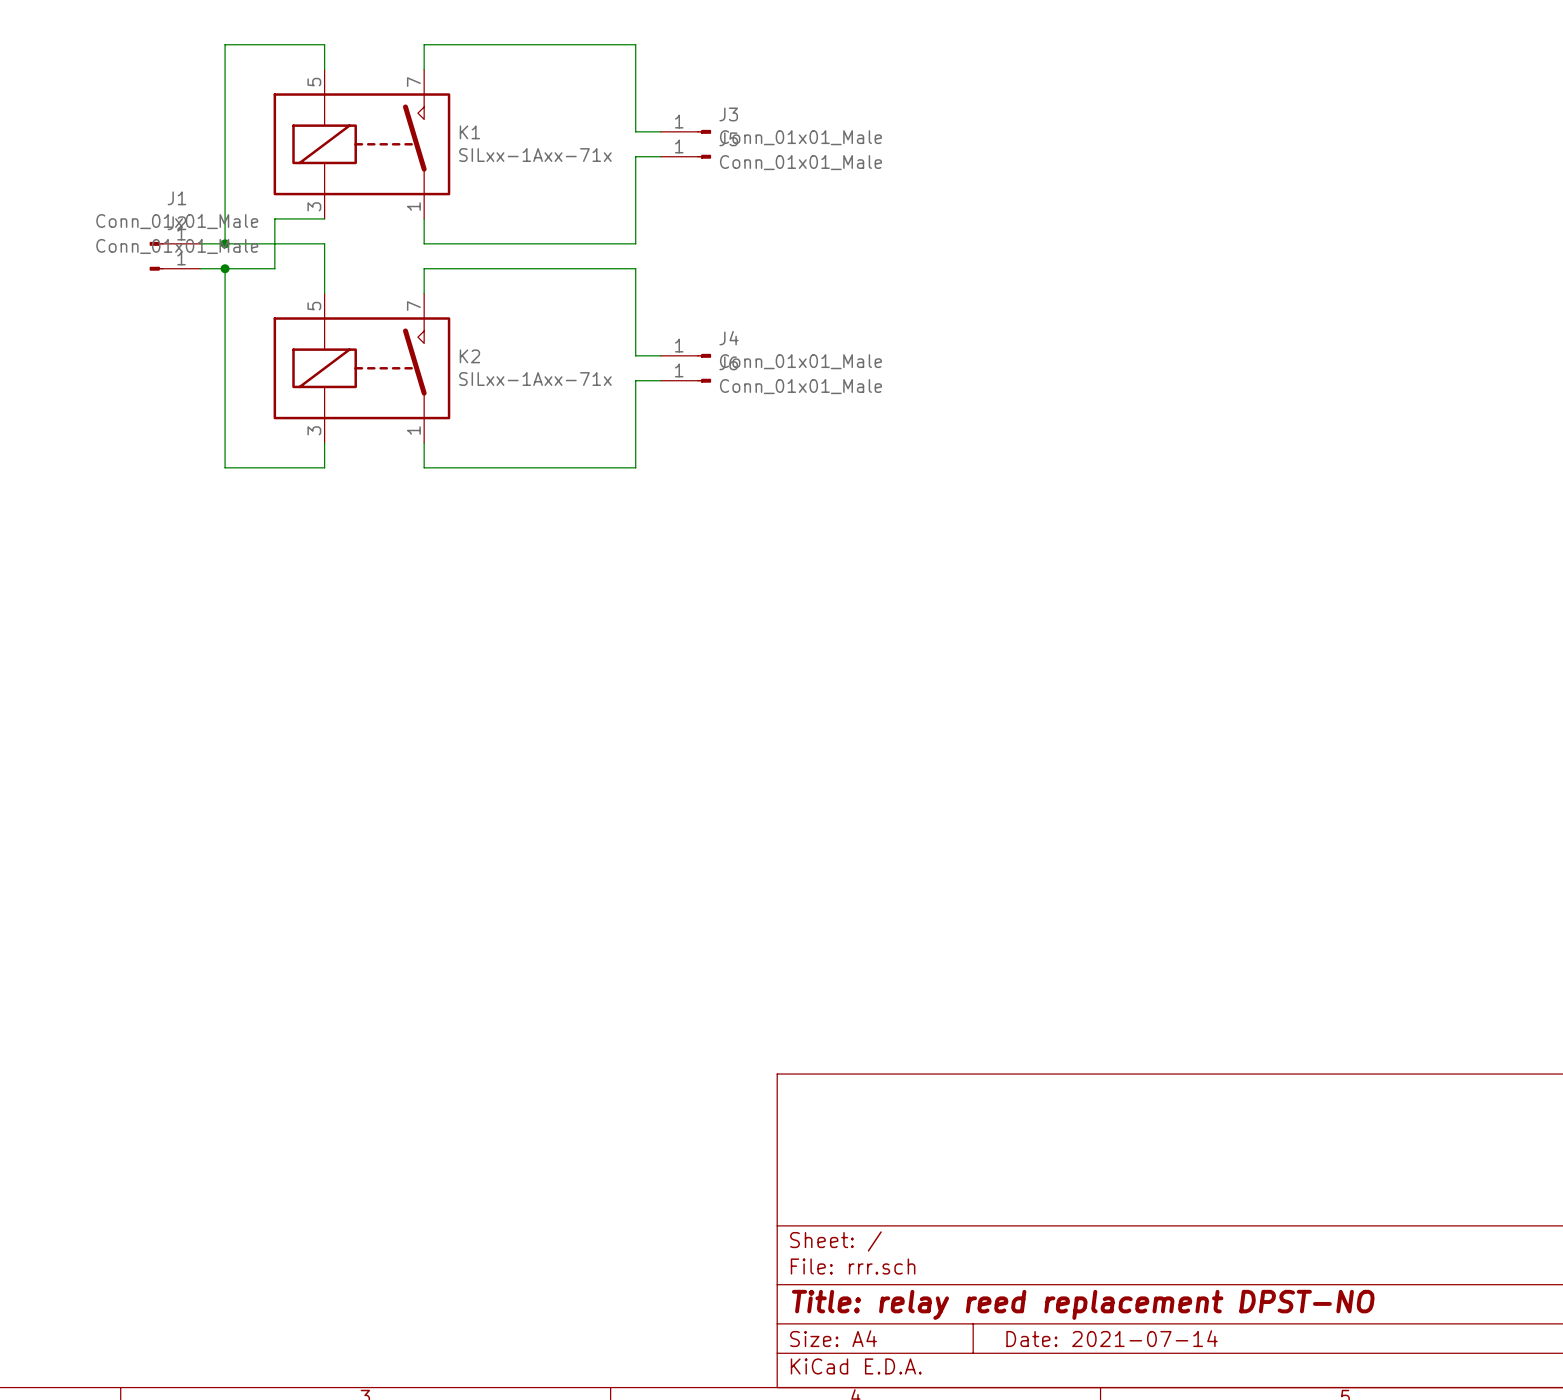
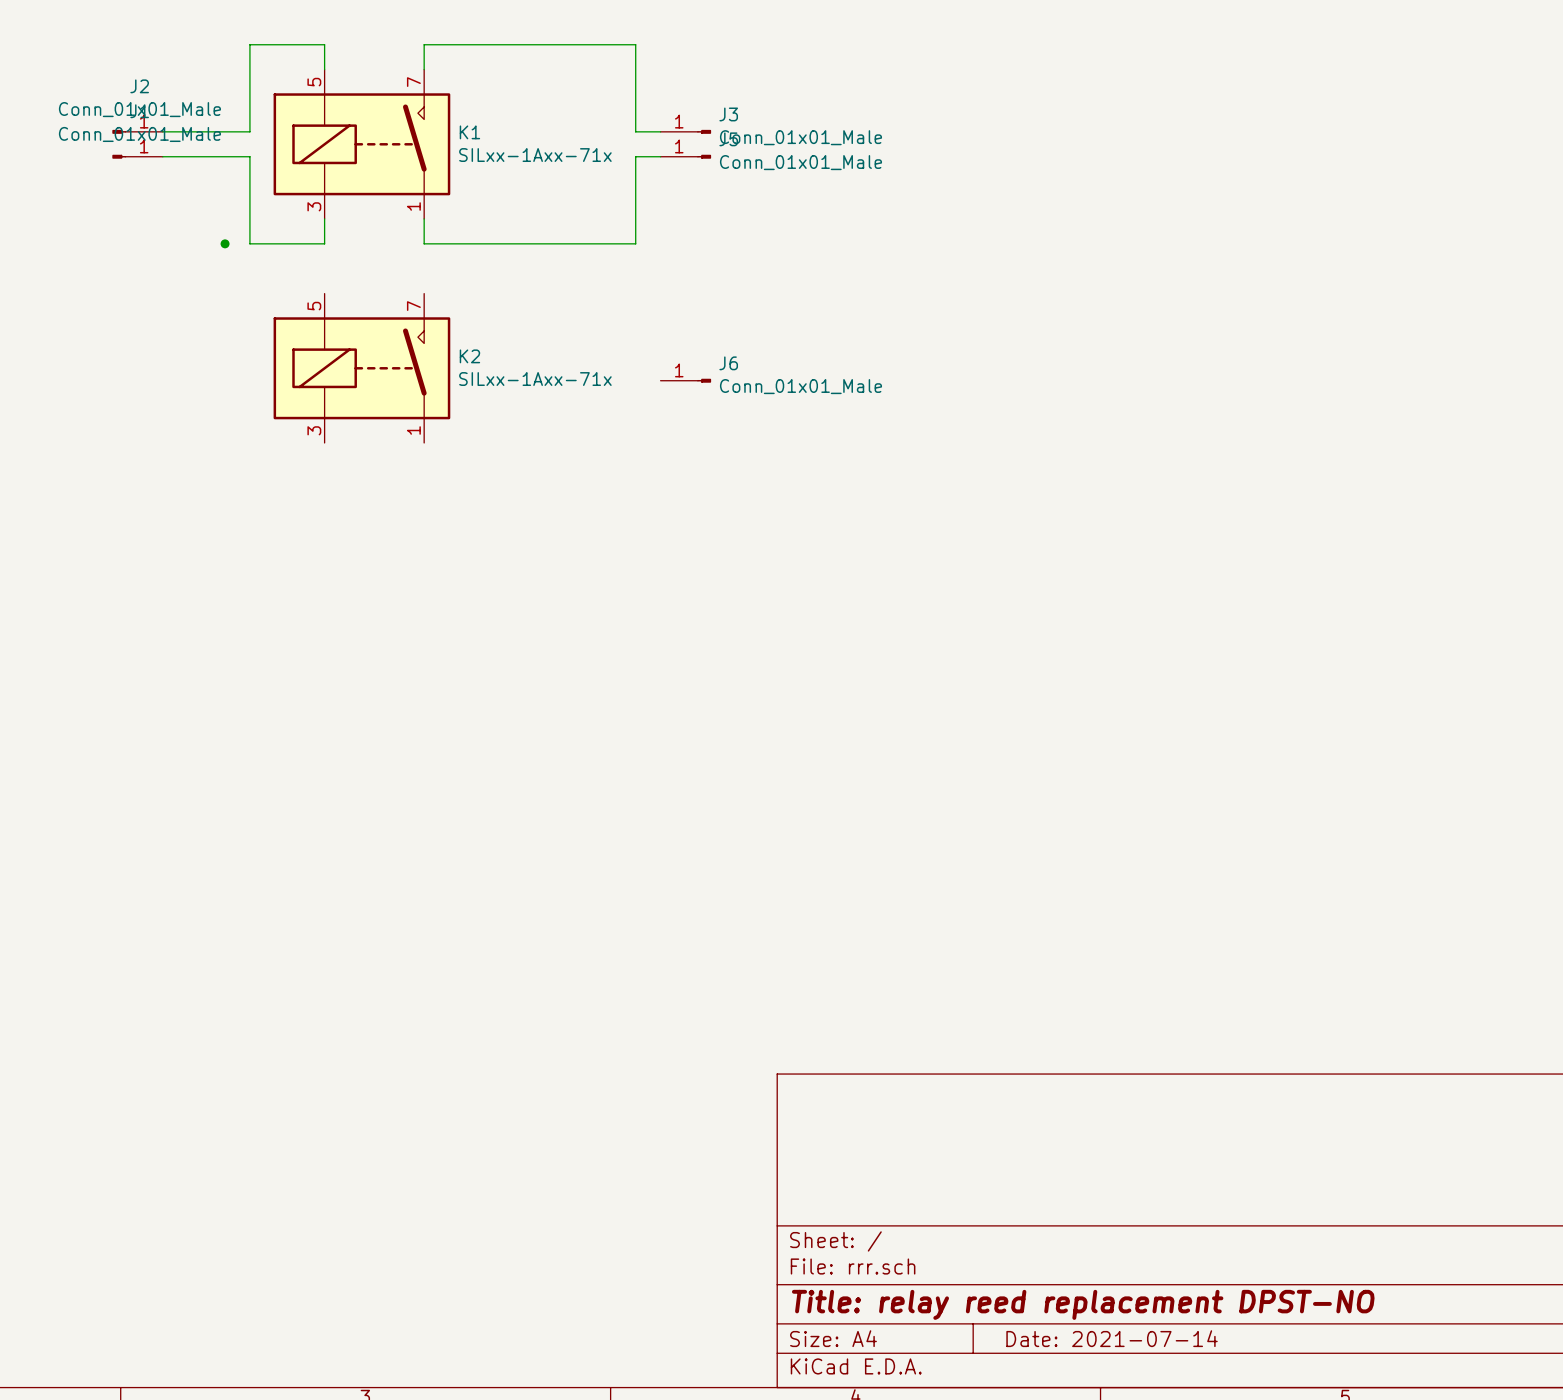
wire: (249, 44) (225, 44) (225, 243) -> (249, 44) (249, 131) (162, 131)
wire: (324, 218) (274, 218) (274, 268) (200, 268) -> none
J1 position: (174, 243) -> (137, 156)
wire: (200, 243) (249, 243) -> (162, 156) (249, 156) (249, 243)
wire: (324, 243) (324, 293) -> (324, 243) (324, 218)
J2 position: (174, 268) -> (137, 131)
wire: (225, 268) (225, 467) (324, 467) (324, 442) -> none
junction: (225, 268) -> none
wire: (424, 293) (424, 268) (635, 268) (635, 355) (660, 355) -> none
J4: Conn_01x01_Male (685, 355) -> none
wire: (660, 380) (635, 380) (635, 467) (424, 467) (424, 442) -> none

